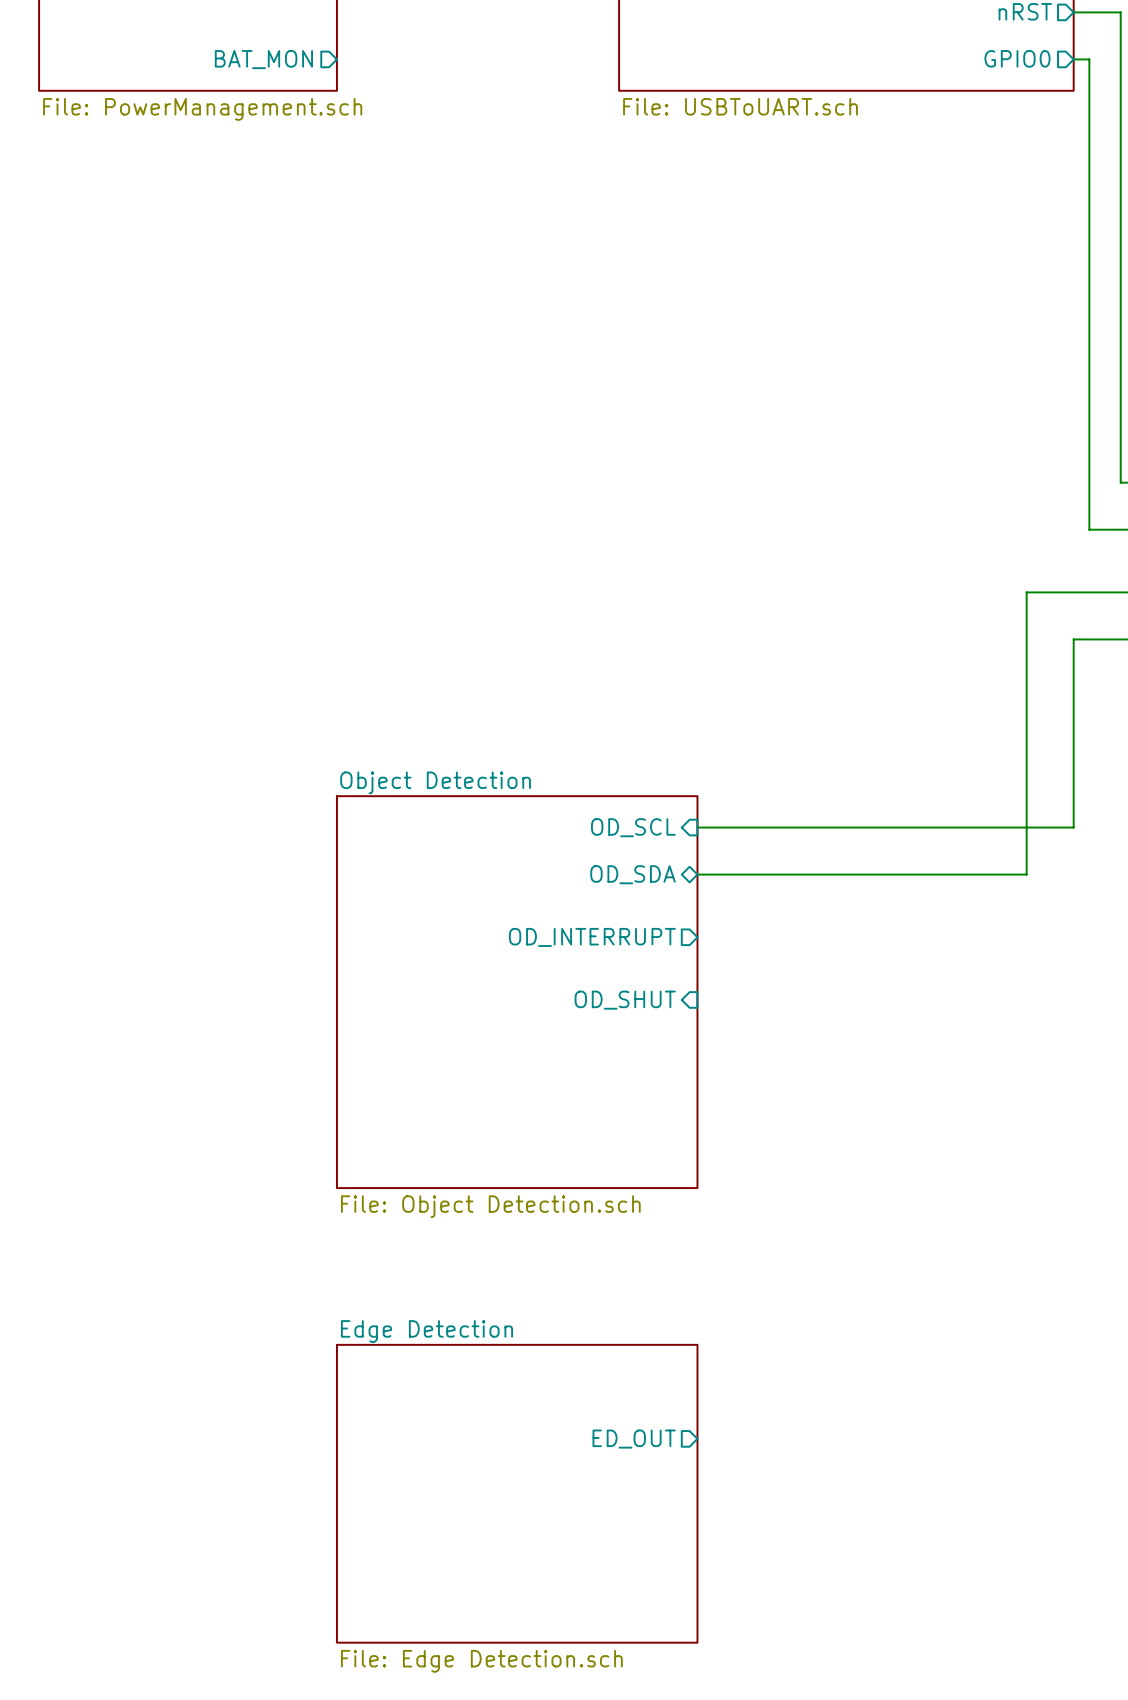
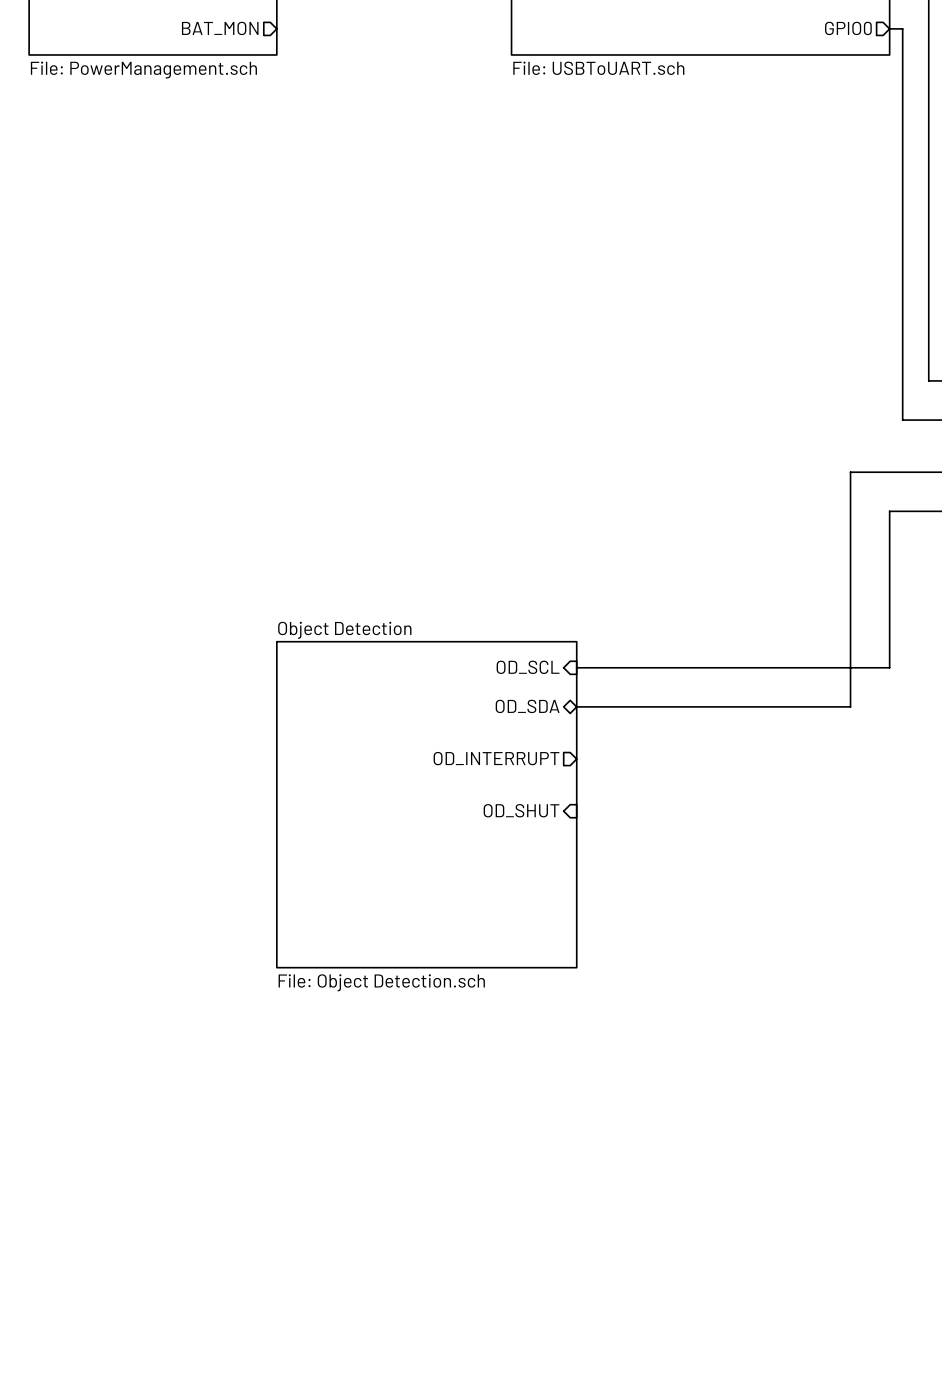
sheet pin: ED_OUT (634, 1439) -> none
sheet Edge Detection: File: Edge Detection.sch (517, 1493) -> none

